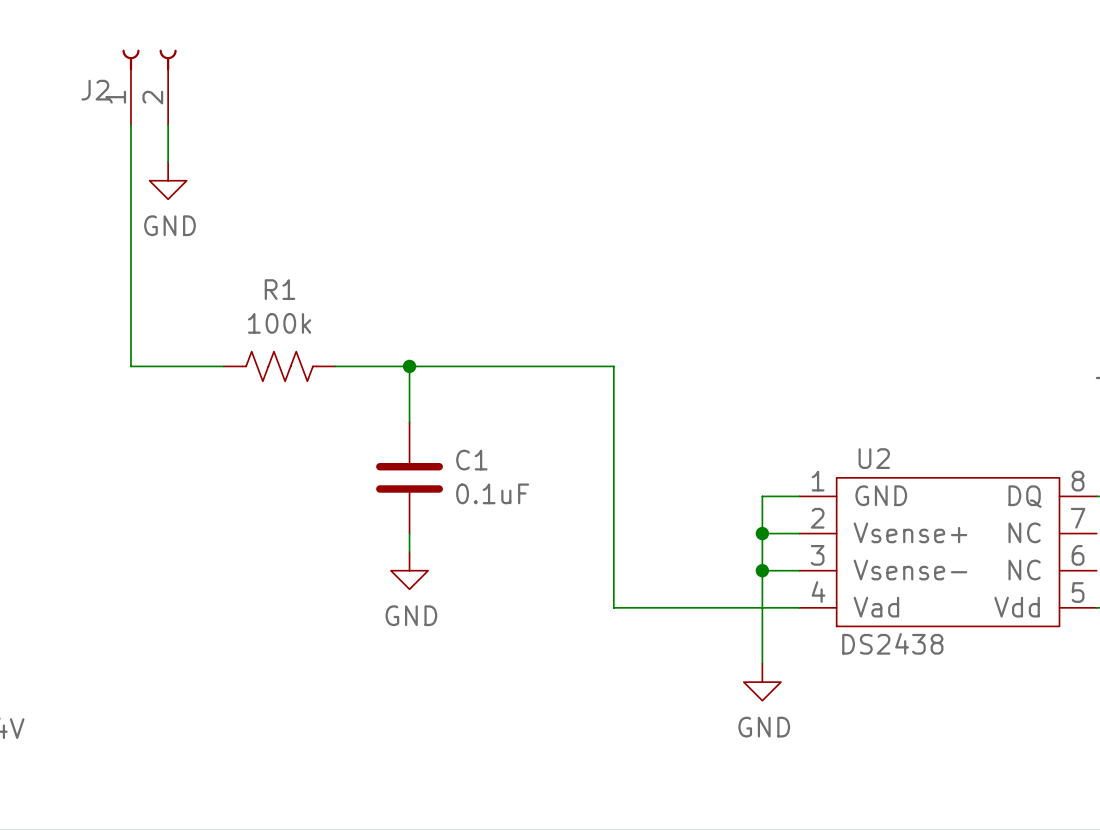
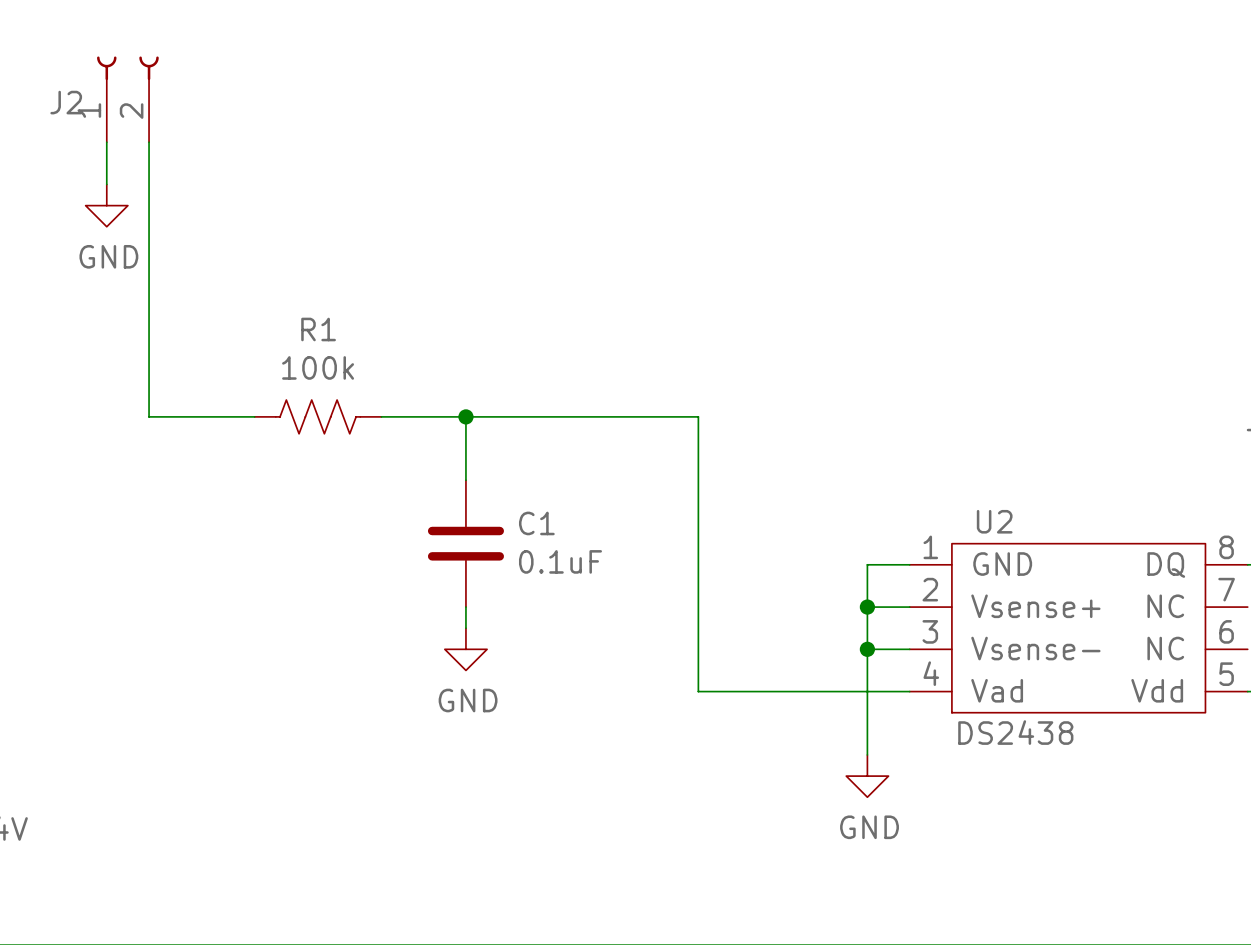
J2 position: (149, 87) -> (127, 99)
wire: (168, 125) (168, 162) -> (106, 142) (106, 184)
power symbol position: GND (168, 180) -> GND (106, 205)

